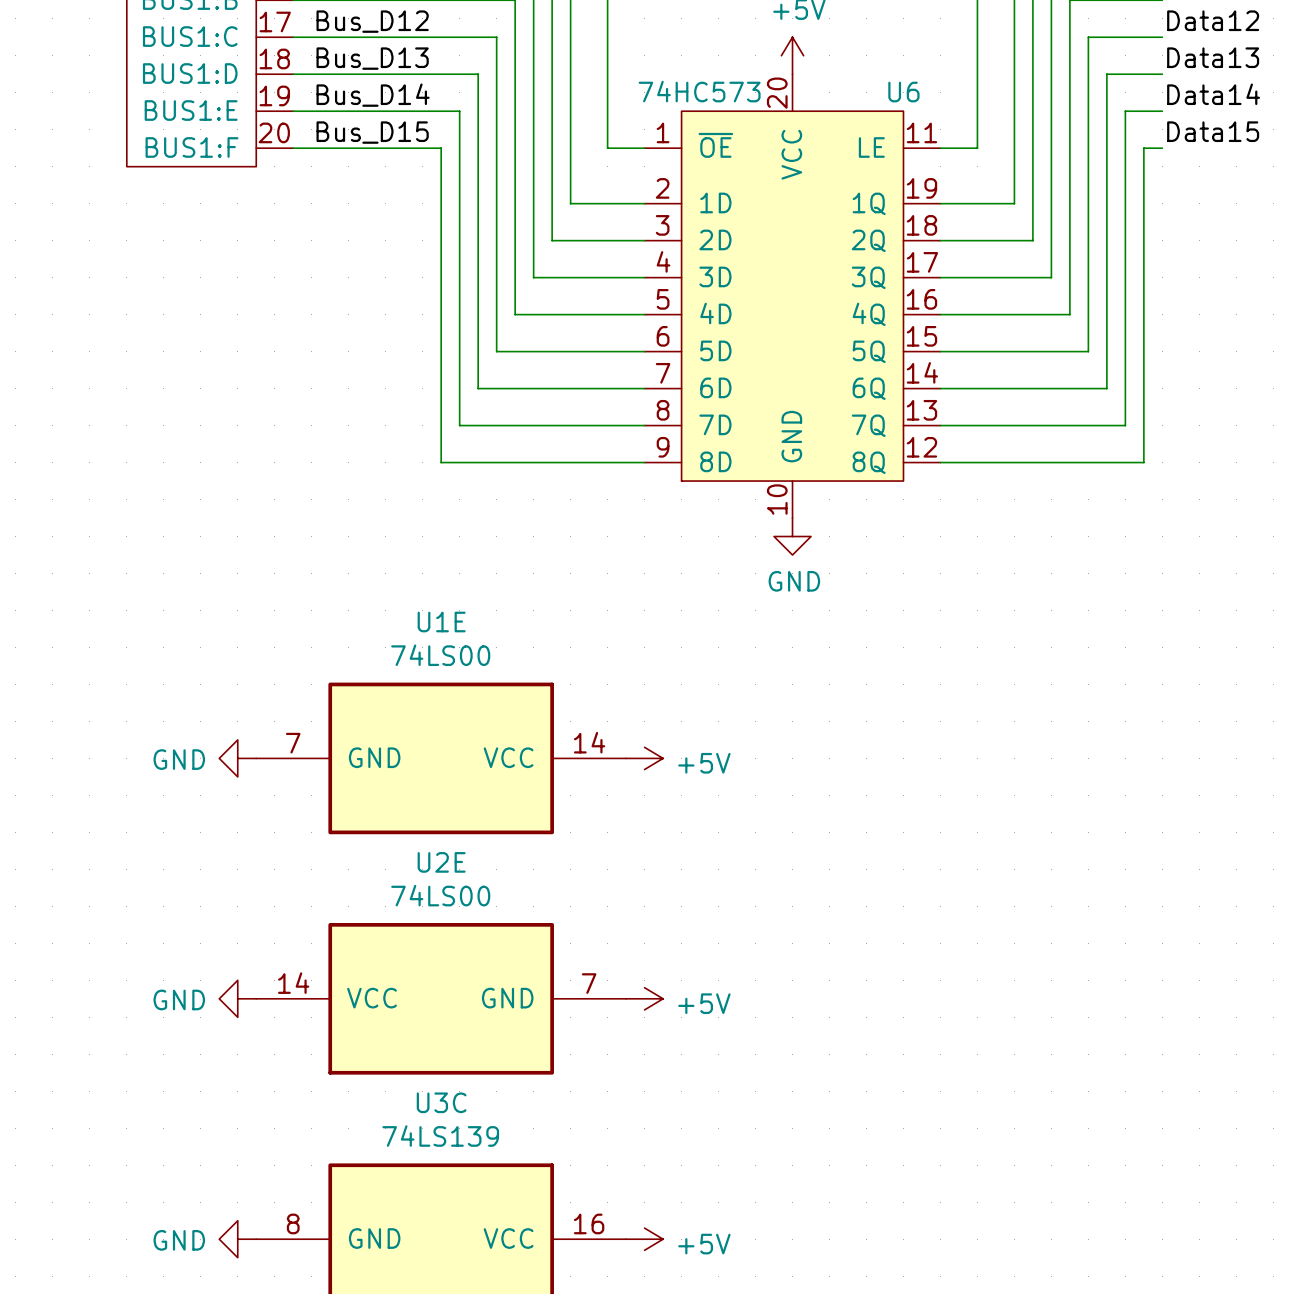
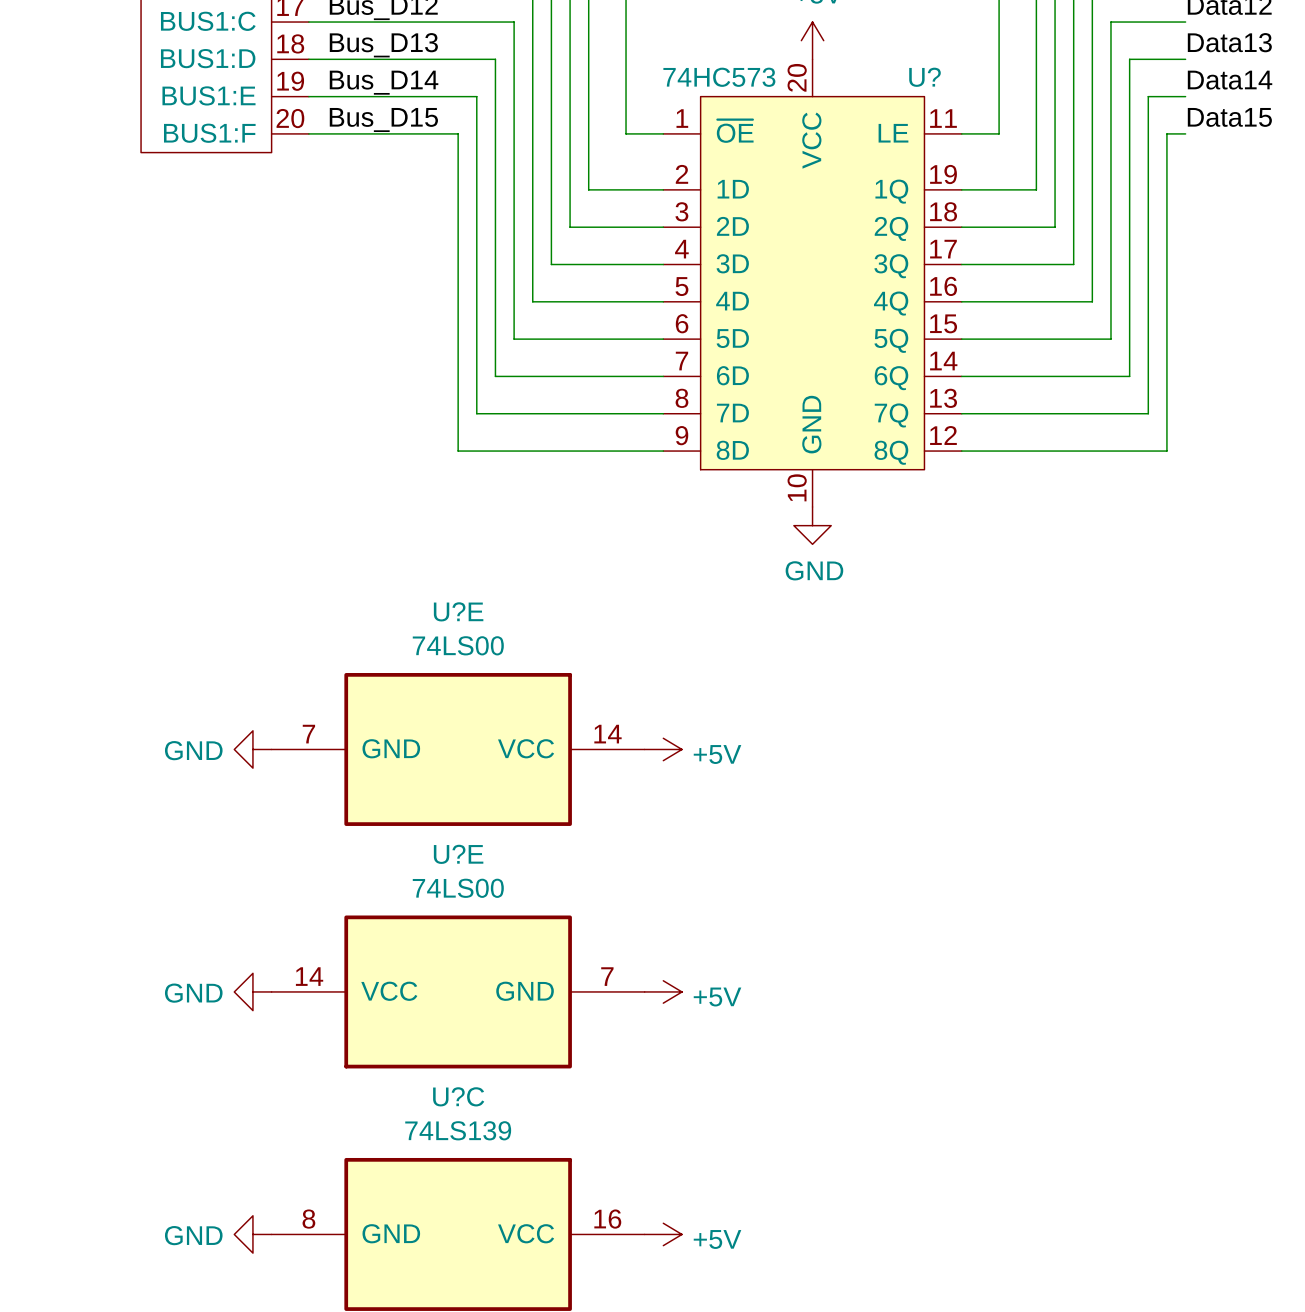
U6 name: U6 (903, 92) -> U? (925, 77)
U1E name: U1E (441, 622) -> U?E (458, 611)
U2E name: U2E (441, 862) -> U?E (458, 854)
U3C name: U3C (441, 1102) -> U?C (458, 1096)

